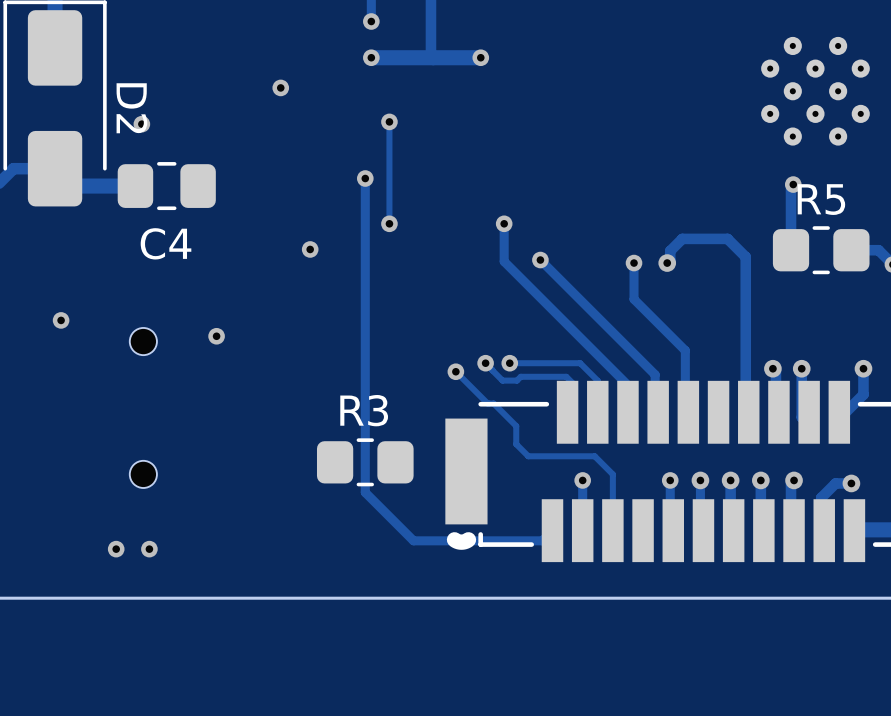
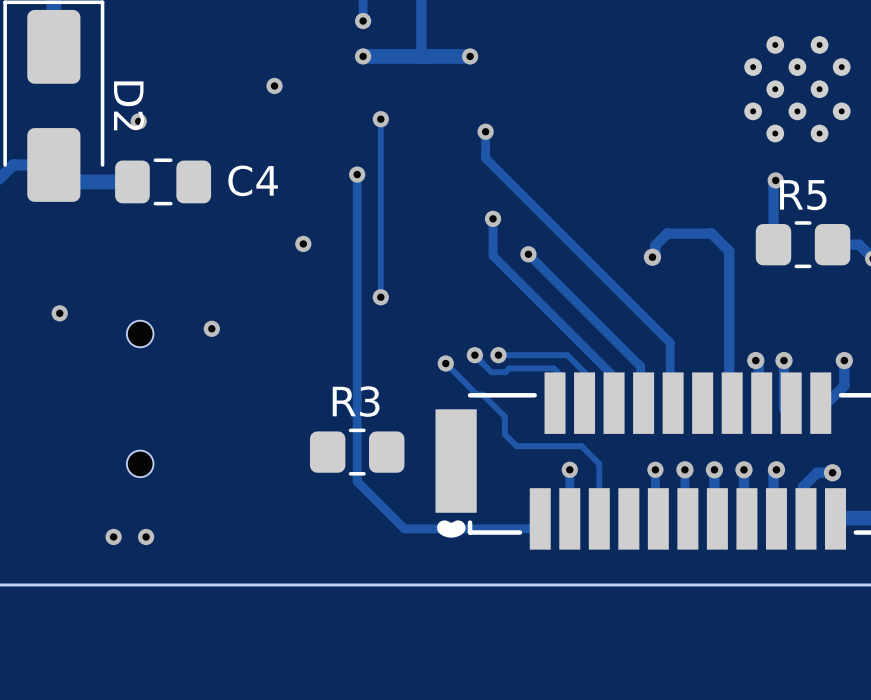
via: none -> (485, 131)
track: none -> (380, 218) (380, 297)
via: (389, 223) -> none
C4 name position: C4 (166, 243) -> C4 (253, 180)
track: (634, 263) (634, 299) -> (485, 131) (485, 158) (619, 292)
via: (634, 263) -> none
via: none -> (380, 297)

